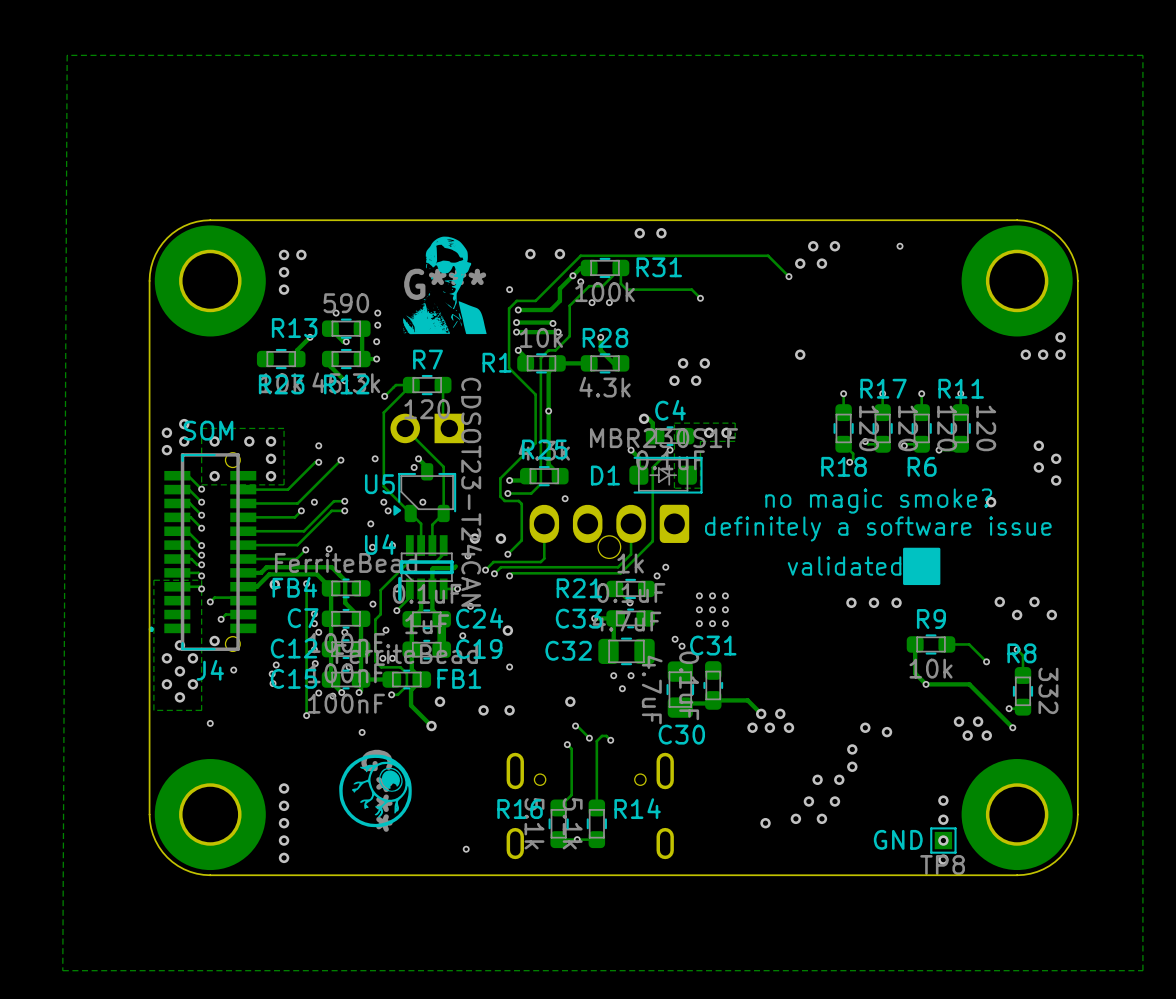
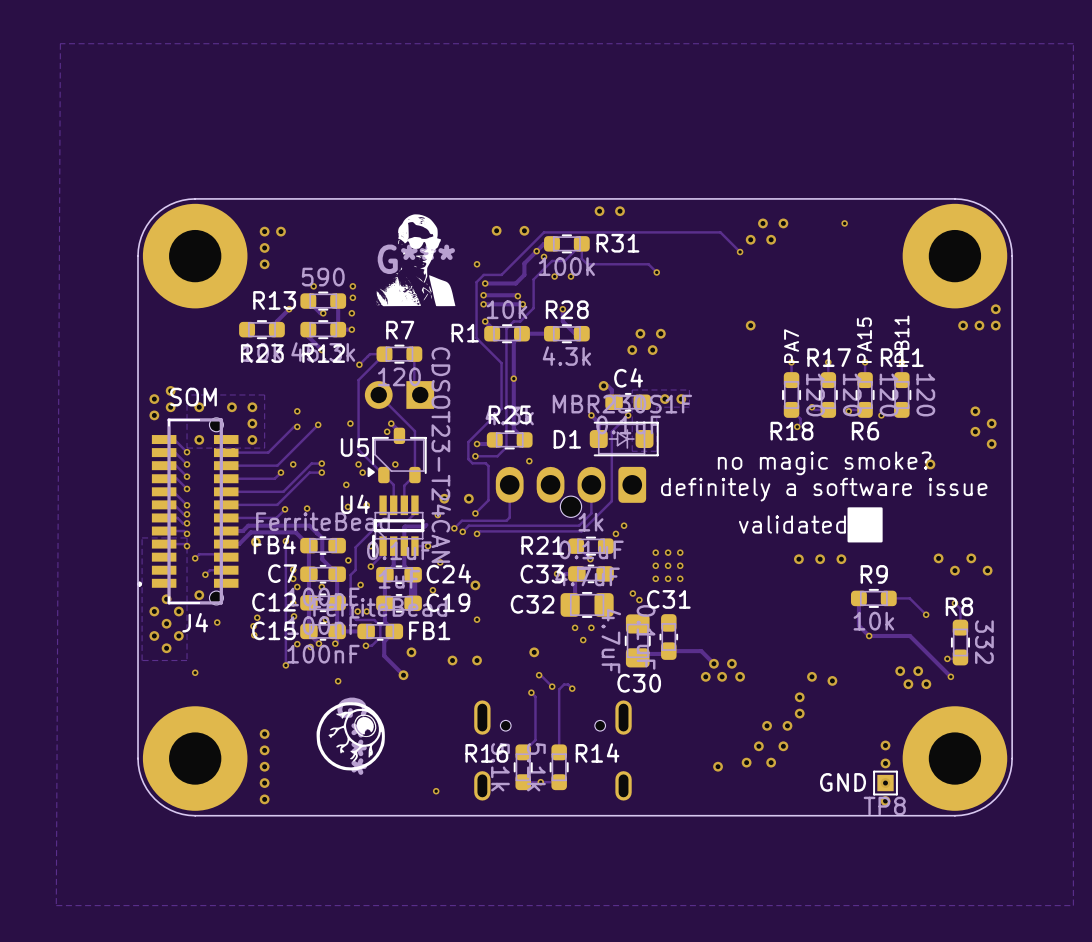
text: none -> PB11 (901, 339)
text: none -> PA15 (864, 340)
text: none -> PA7 (791, 346)

